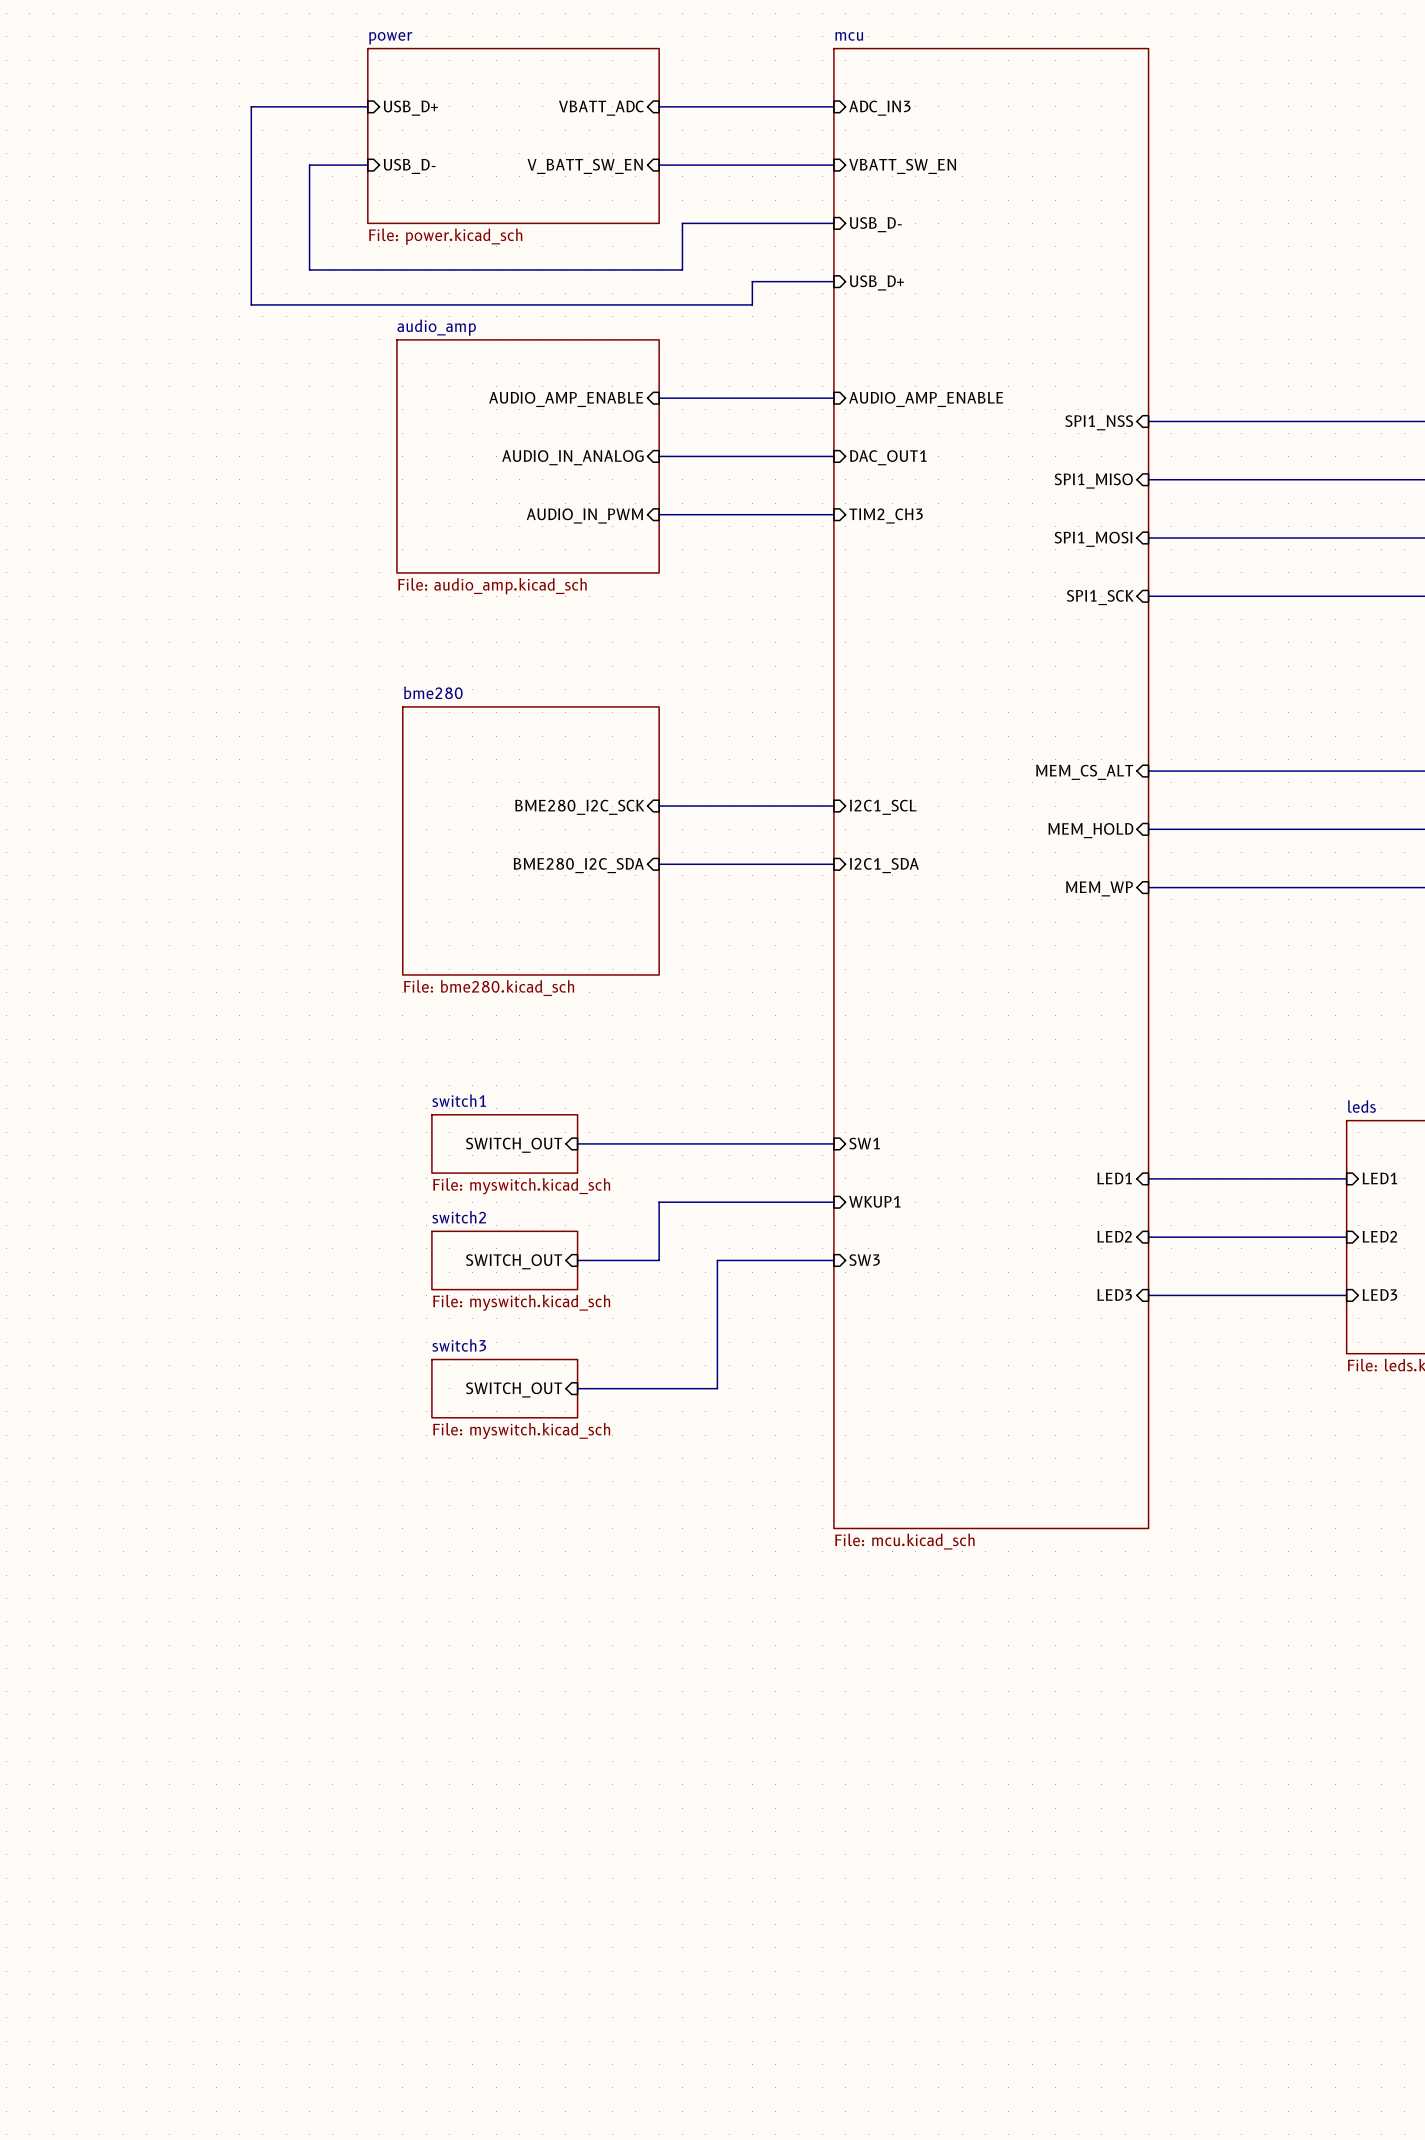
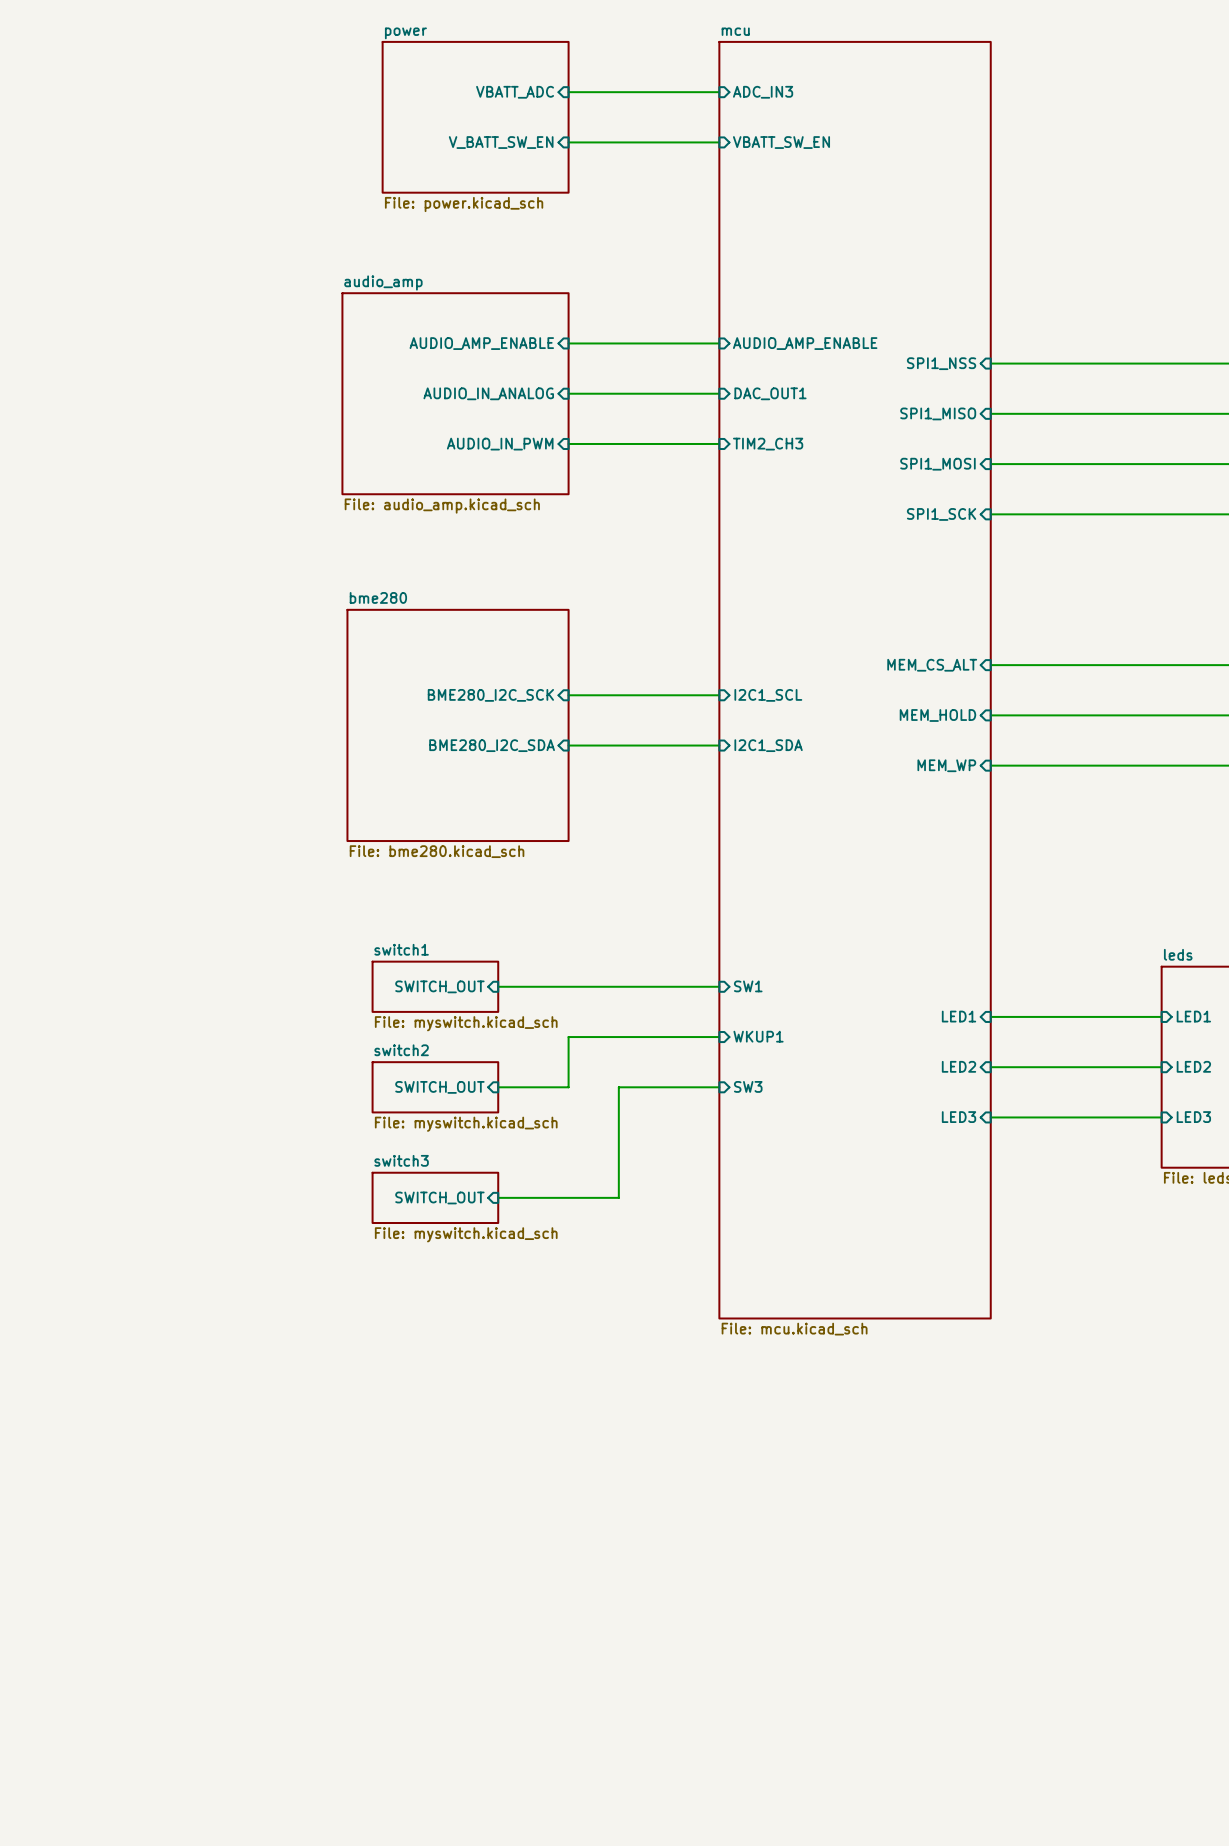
wire: (367, 106) (251, 106) (251, 304) (752, 304) (752, 281) (833, 281) -> none
sheet pin: USB_D+ (410, 108) -> none
sheet power: File: power.kicad_sch (513, 135) -> none
sheet power: none -> File: power.kicad_sch (475, 117)
wire: (367, 165) (309, 165) (309, 269) (682, 269) (682, 223) (833, 223) -> none
sheet pin: USB_D- (409, 166) -> none
sheet pin: USB_D- (875, 224) -> none
sheet pin: USB_D+ (876, 282) -> none

